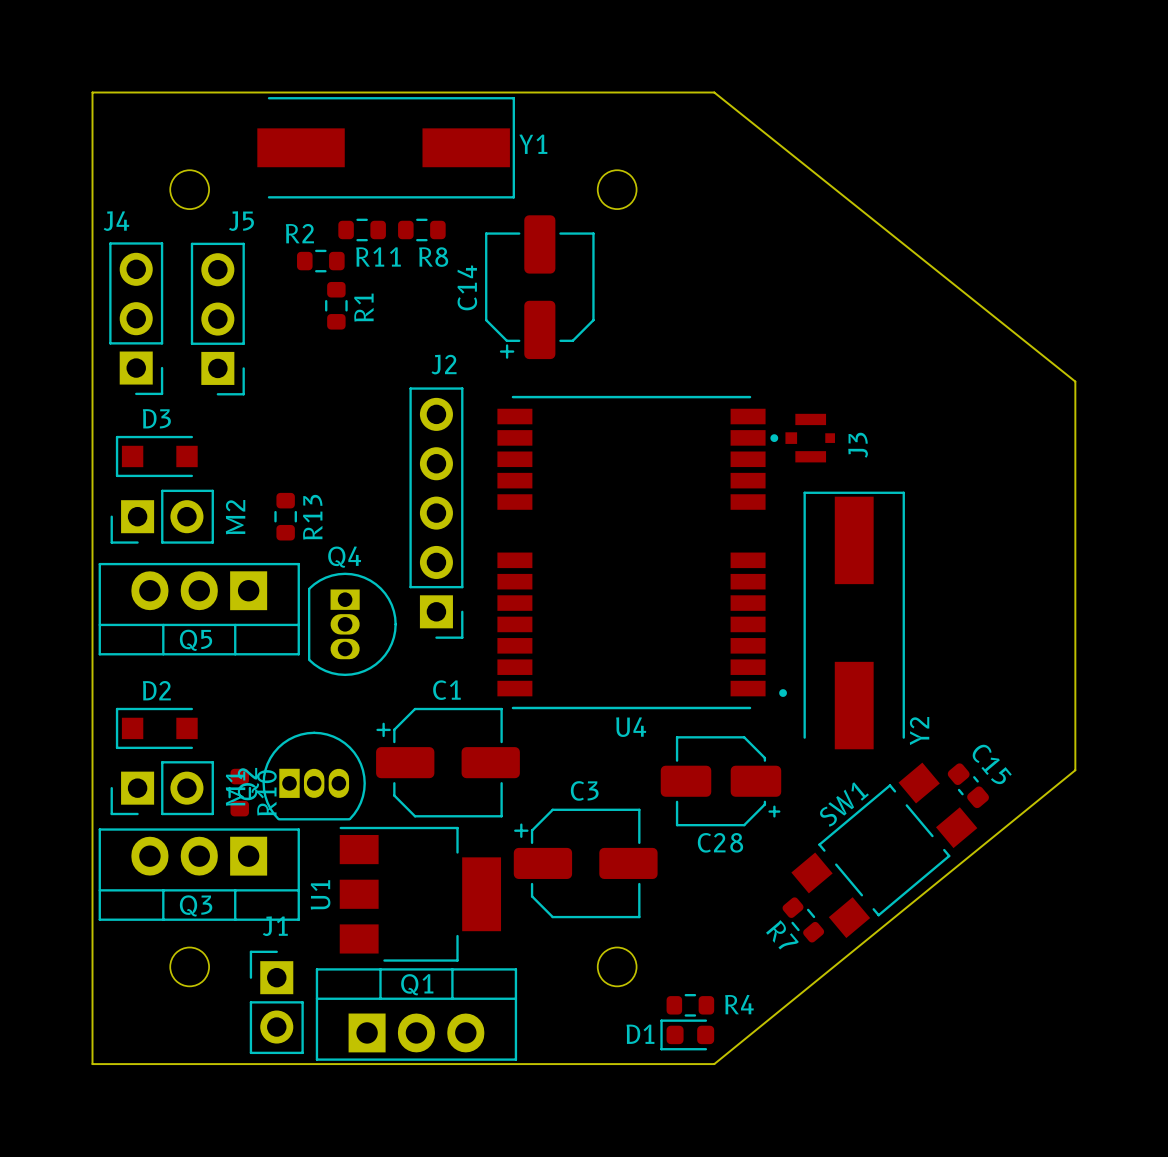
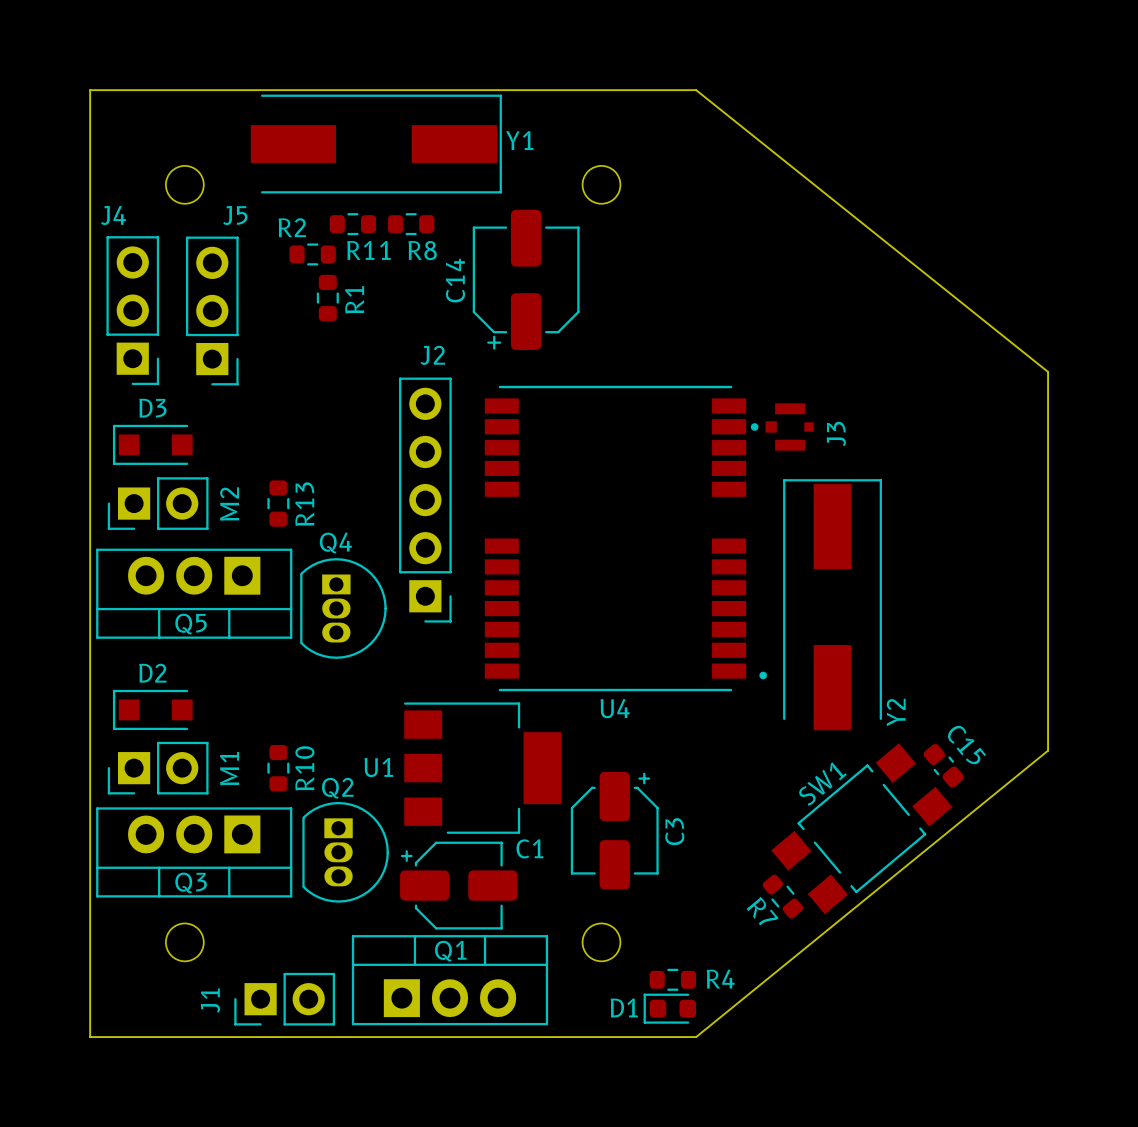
C1 name position: C1 (446, 690) -> C1 (529, 848)
C1 footprint: [376, 707, 520, 818] -> [400, 841, 518, 930]
Q2 rotation: 0° (314, 776) -> 90° clockwise (345, 852)
Q2 position: (314, 776) -> (345, 852)
C28: (720, 781) -> none
C3 name position: C3 (584, 790) -> C3 (674, 831)
R10 position: (239, 792) -> (278, 768)
C3 footprint: [513, 808, 658, 919] -> [570, 771, 659, 890]
U1 name rotation: 0° (320, 894) -> 90° clockwise (378, 767)
U1 position: (420, 894) -> (482, 768)
J1 rotation: 0° (276, 1002) -> 90° counterclockwise (284, 999)
Q1 position: (416, 1014) -> (449, 980)

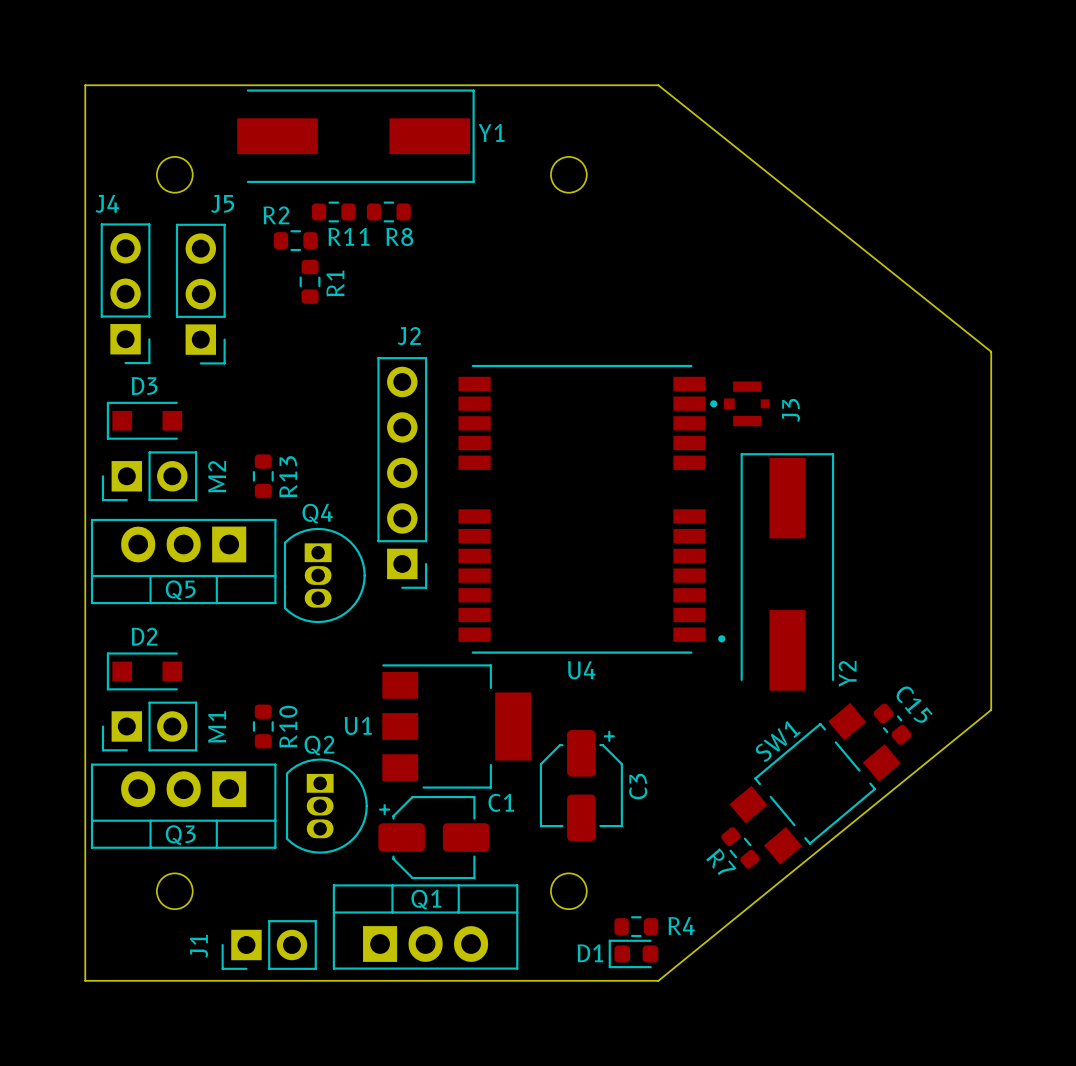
C14: (526, 279) -> none

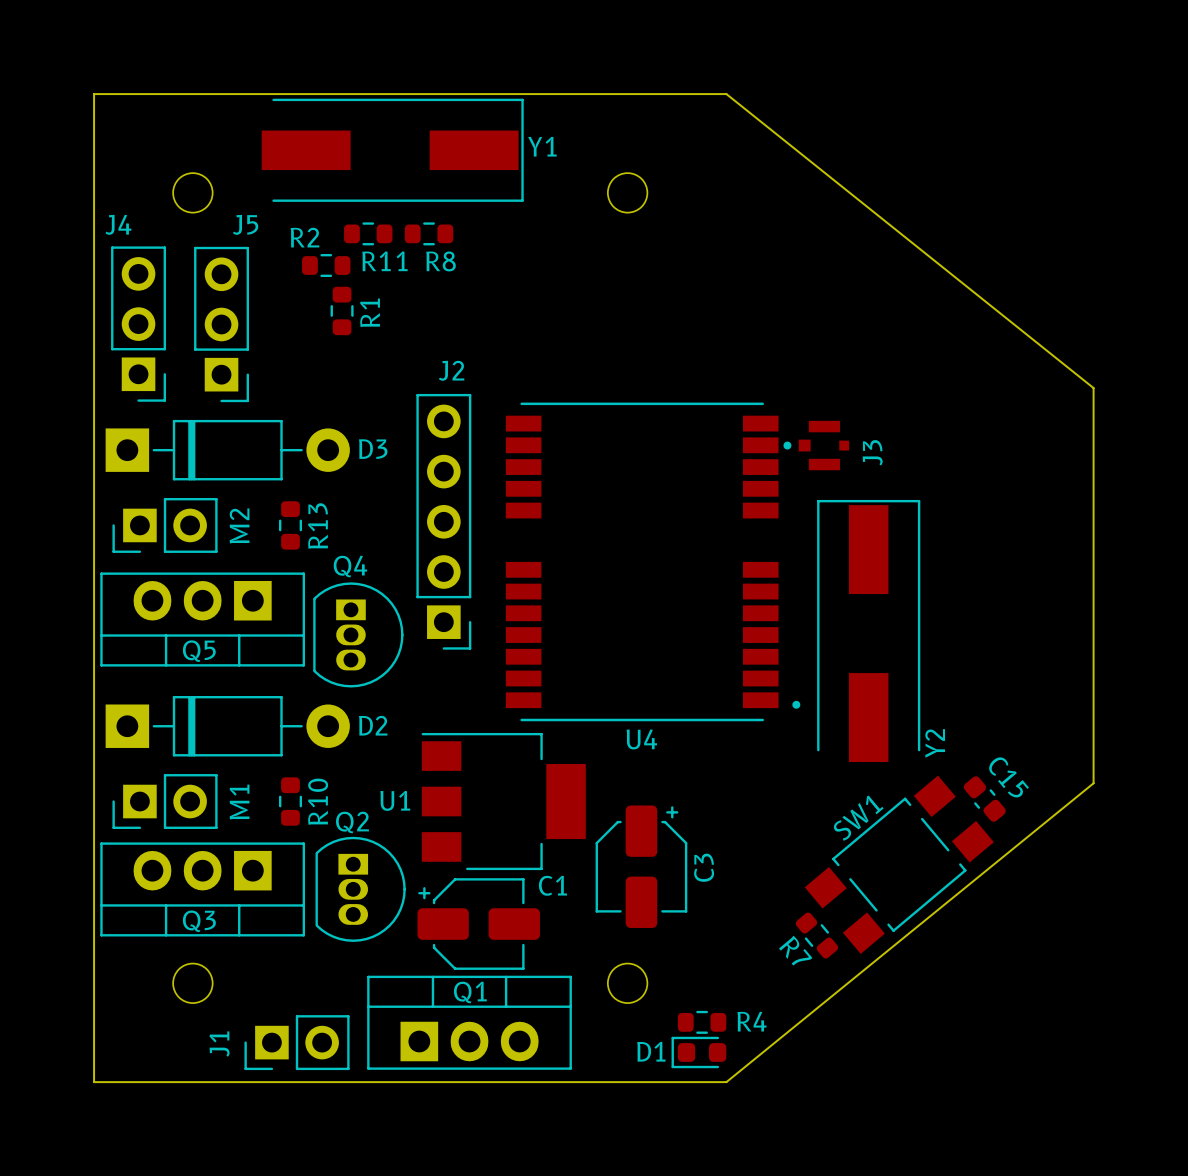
D3 name position: D3 (144, 386) -> D3 (373, 449)
D3 footprint: [106, 401, 183, 440] -> [105, 419, 350, 481]
D2 name position: D2 (144, 636) -> D2 (373, 725)
D2 footprint: [106, 652, 183, 691] -> [105, 695, 350, 757]

